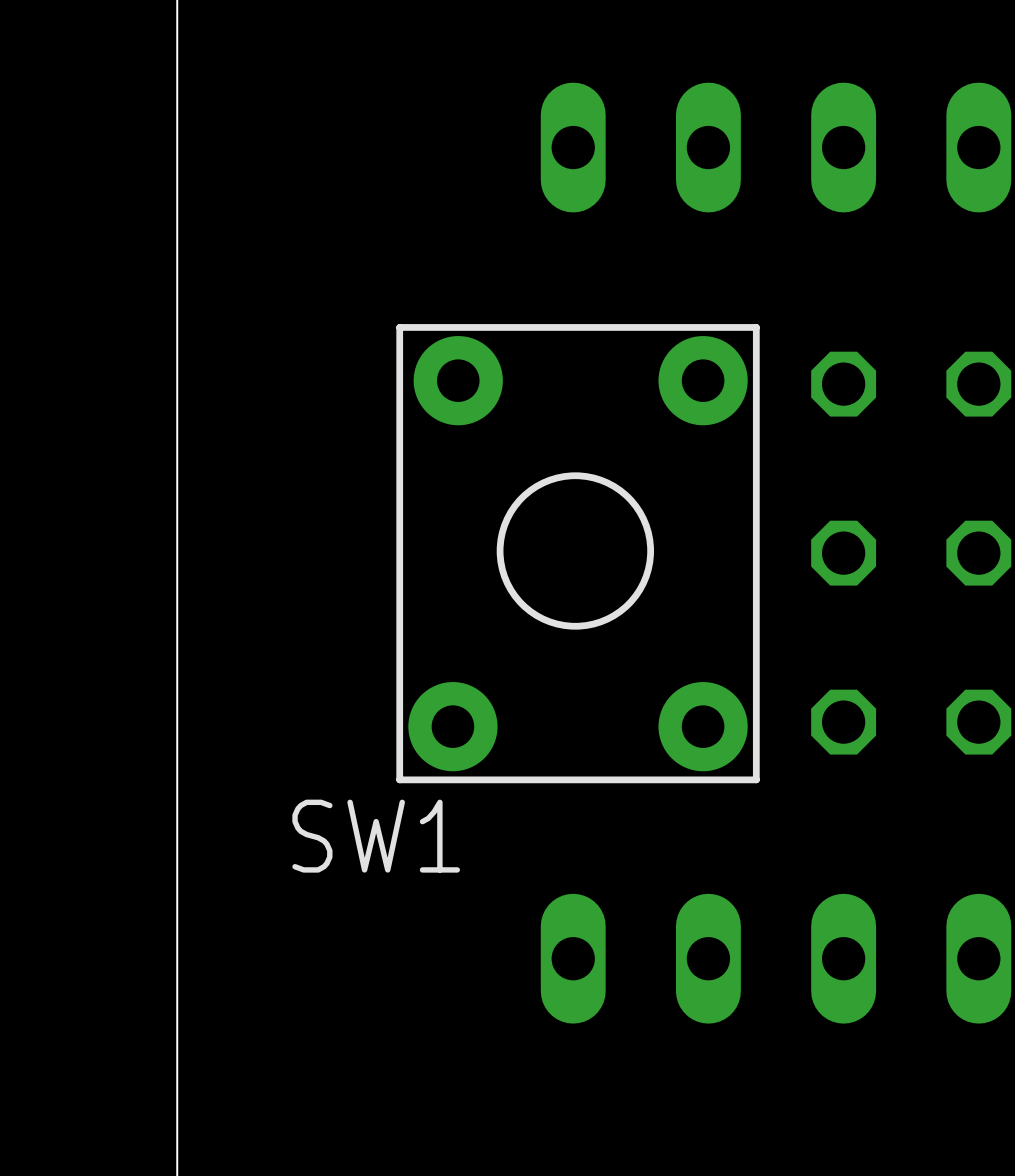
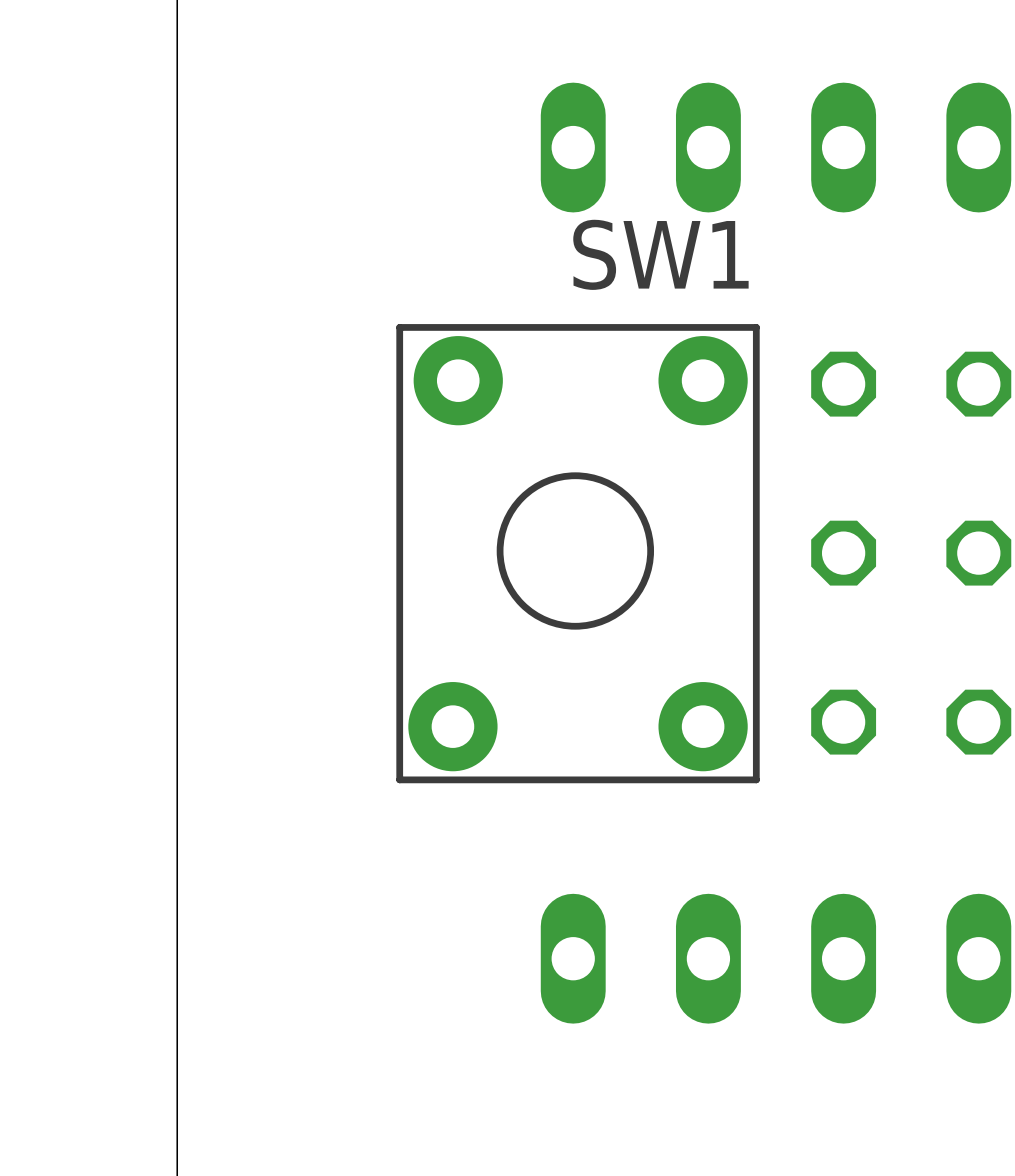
SW1 name position: SW1 (376, 836) -> SW1 (660, 254)

